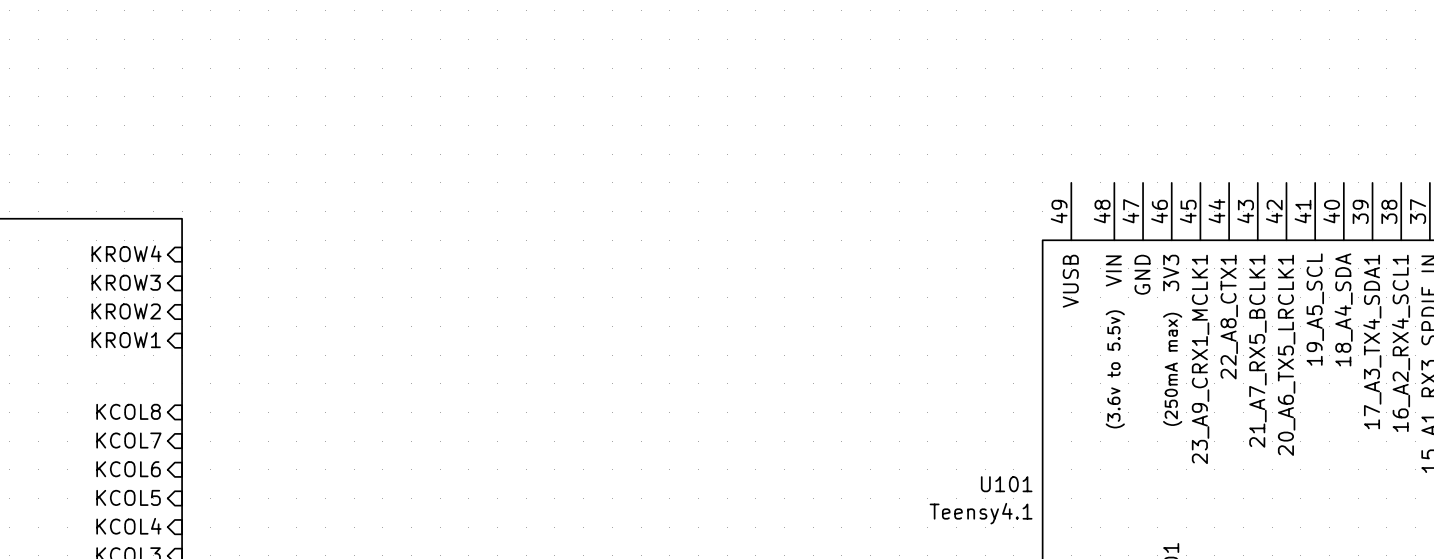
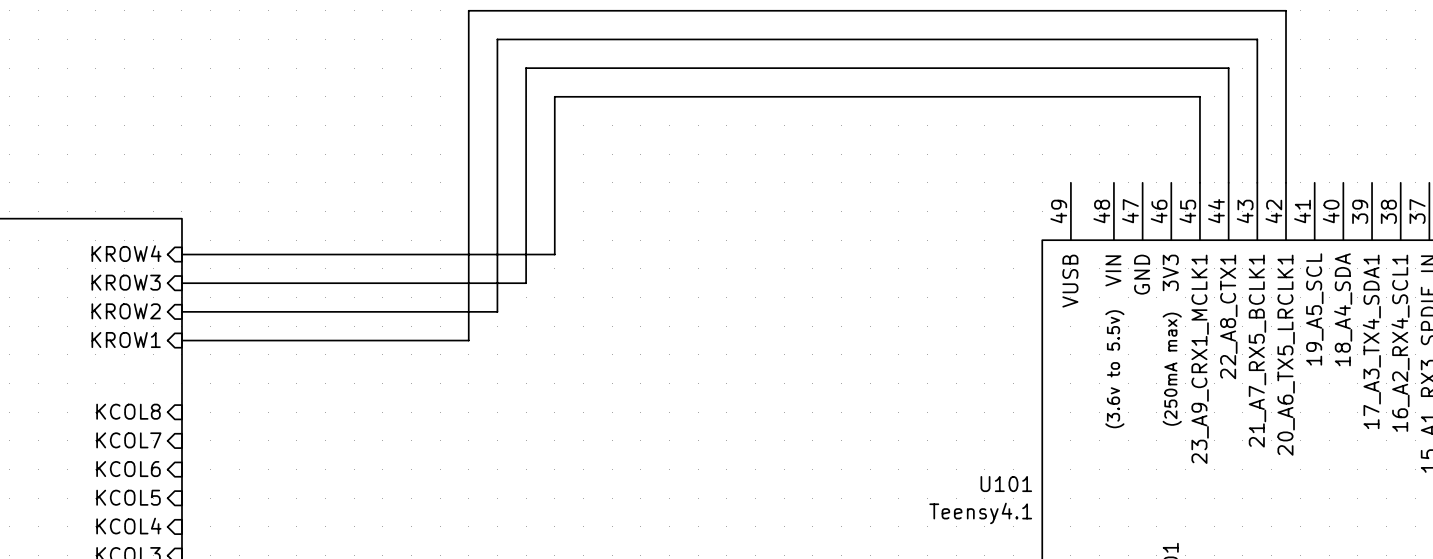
wire: none -> (1199, 182) (1199, 96) (554, 96) (554, 254) (181, 254)
wire: none -> (1228, 182) (1228, 68) (526, 68) (526, 283) (181, 283)
wire: none -> (1257, 182) (1257, 39) (497, 39) (497, 311) (181, 311)
wire: none -> (1286, 182) (1286, 10) (468, 10) (468, 340) (181, 340)

